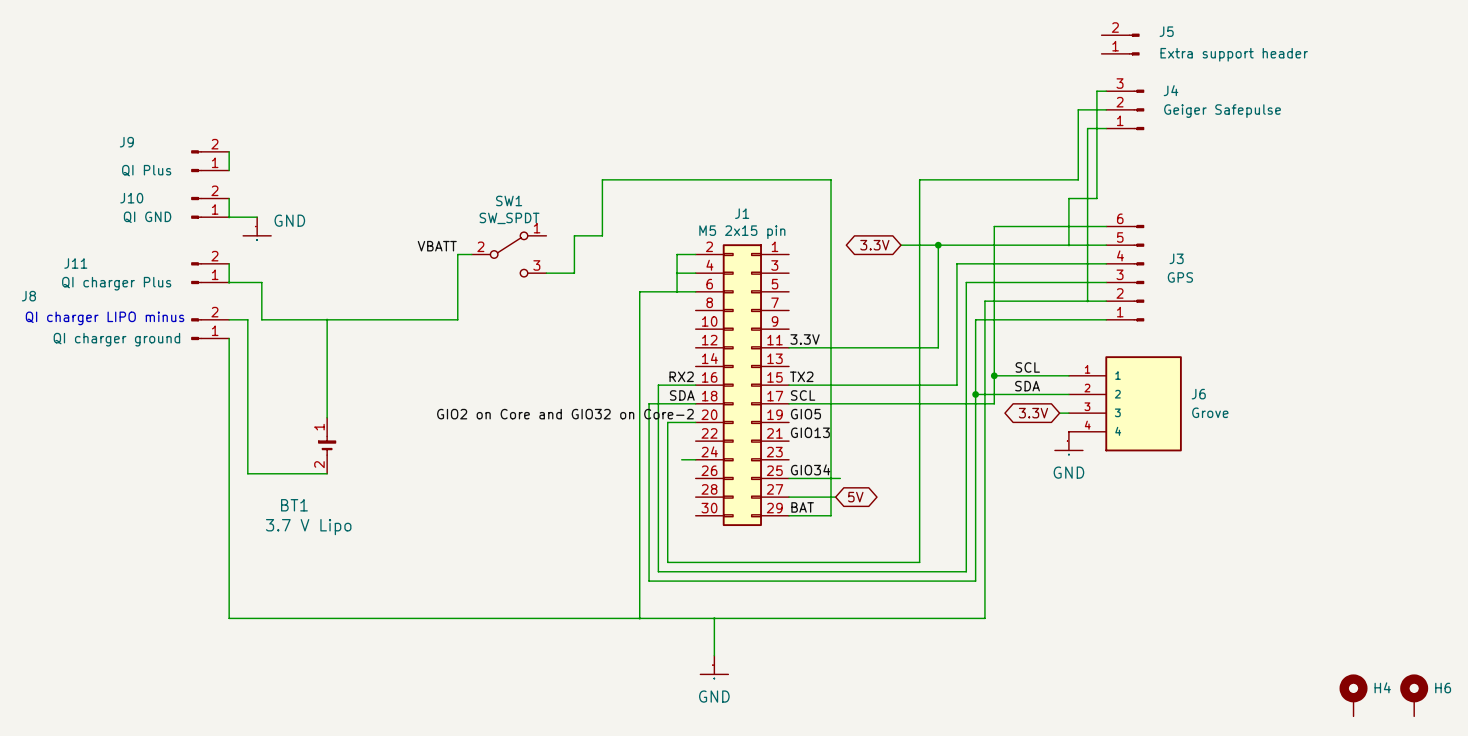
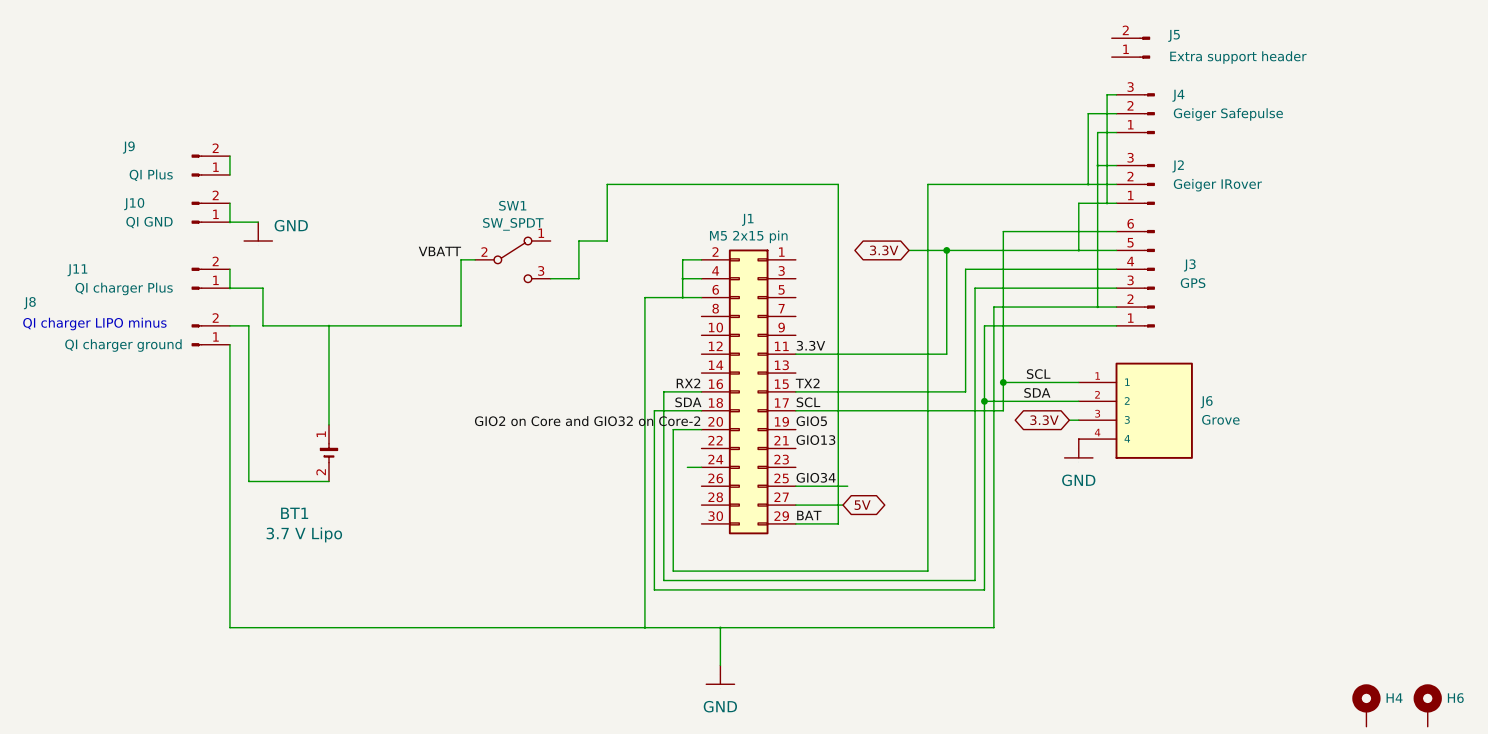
wire: none -> (1097, 165) (1116, 165)
wire: none -> (1088, 184) (1116, 184)
J2: none -> Geiger IRover (1135, 184)
wire: none -> (1107, 203) (1116, 203)

